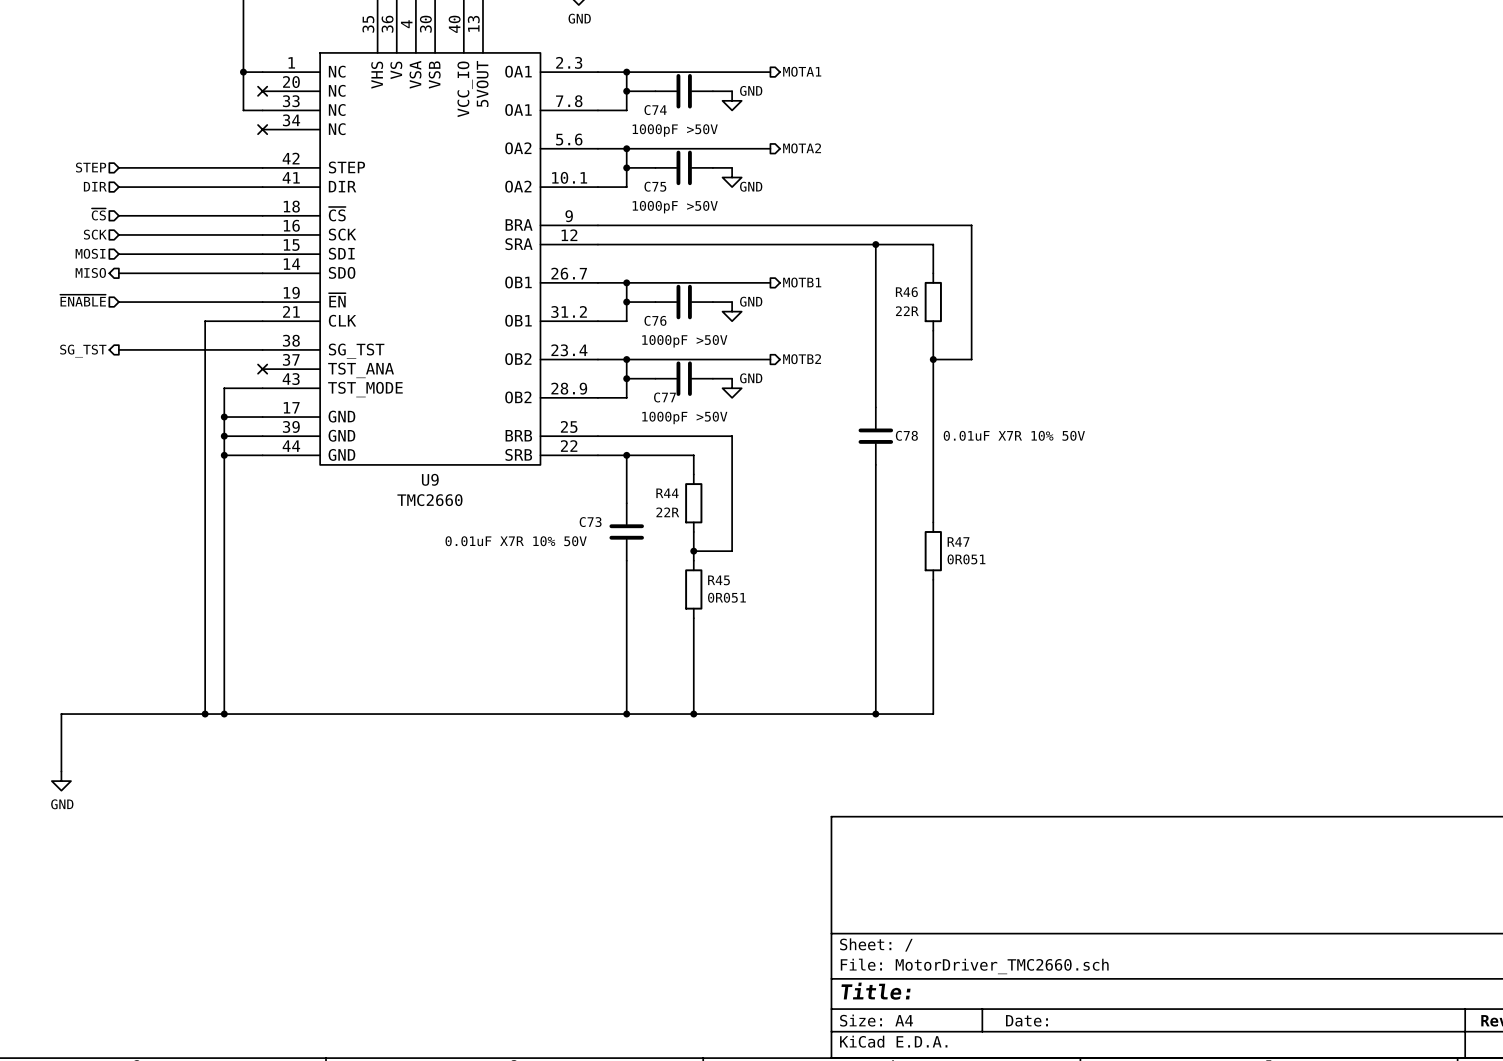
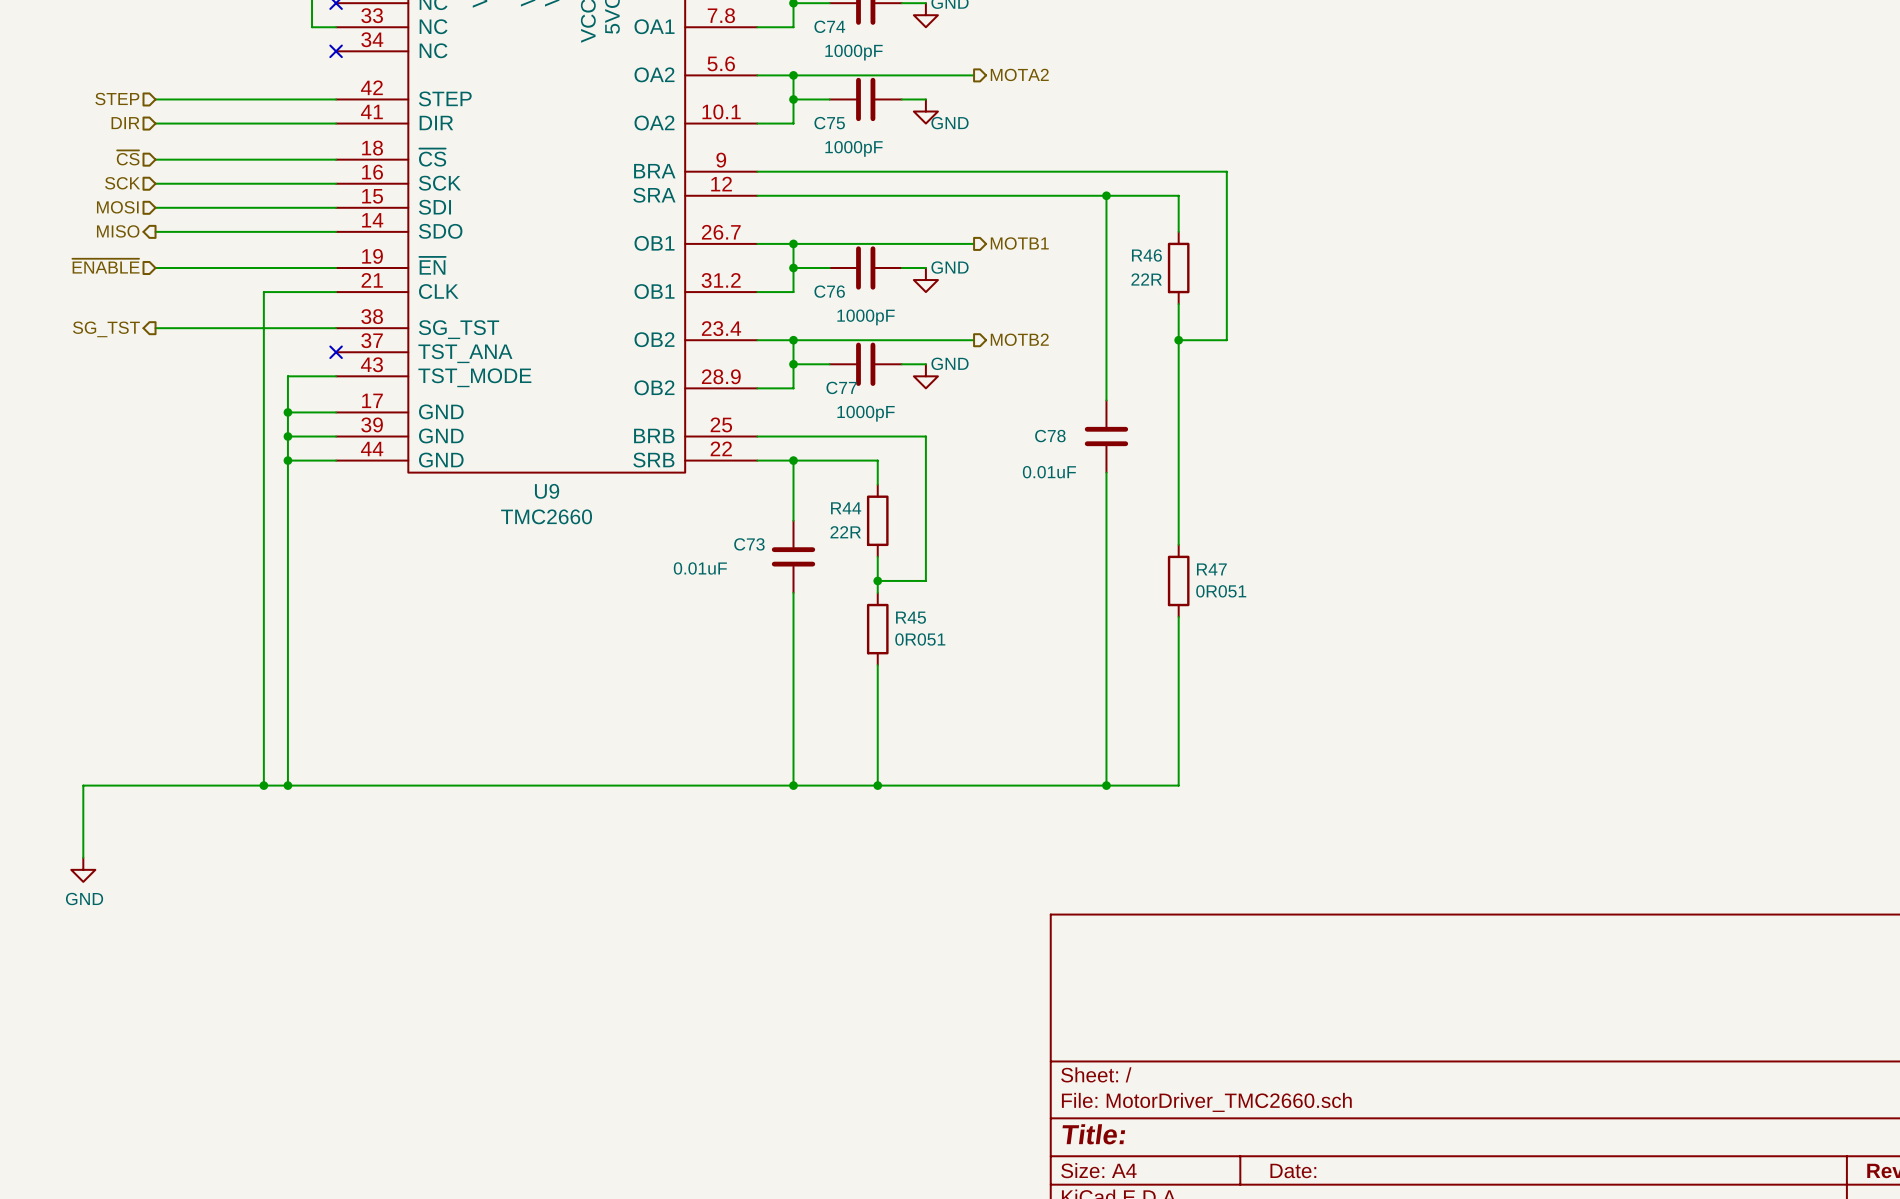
C74 value: 1000pF >50V (675, 130) -> 1000pF (854, 52)
C75 value: 1000pF >50V (675, 207) -> 1000pF (854, 148)
C76 value: 1000pF >50V (684, 341) -> 1000pF (866, 317)
C77 value: 1000pF >50V (684, 417) -> 1000pF (866, 413)
C78 name position: C78 (906, 435) -> C78 (1050, 436)
C78 value: 0.01uF X7R 10% 50V (1014, 435) -> 0.01uF (1049, 472)
C73 value: 0.01uF X7R 10% 50V (516, 541) -> 0.01uF (700, 568)

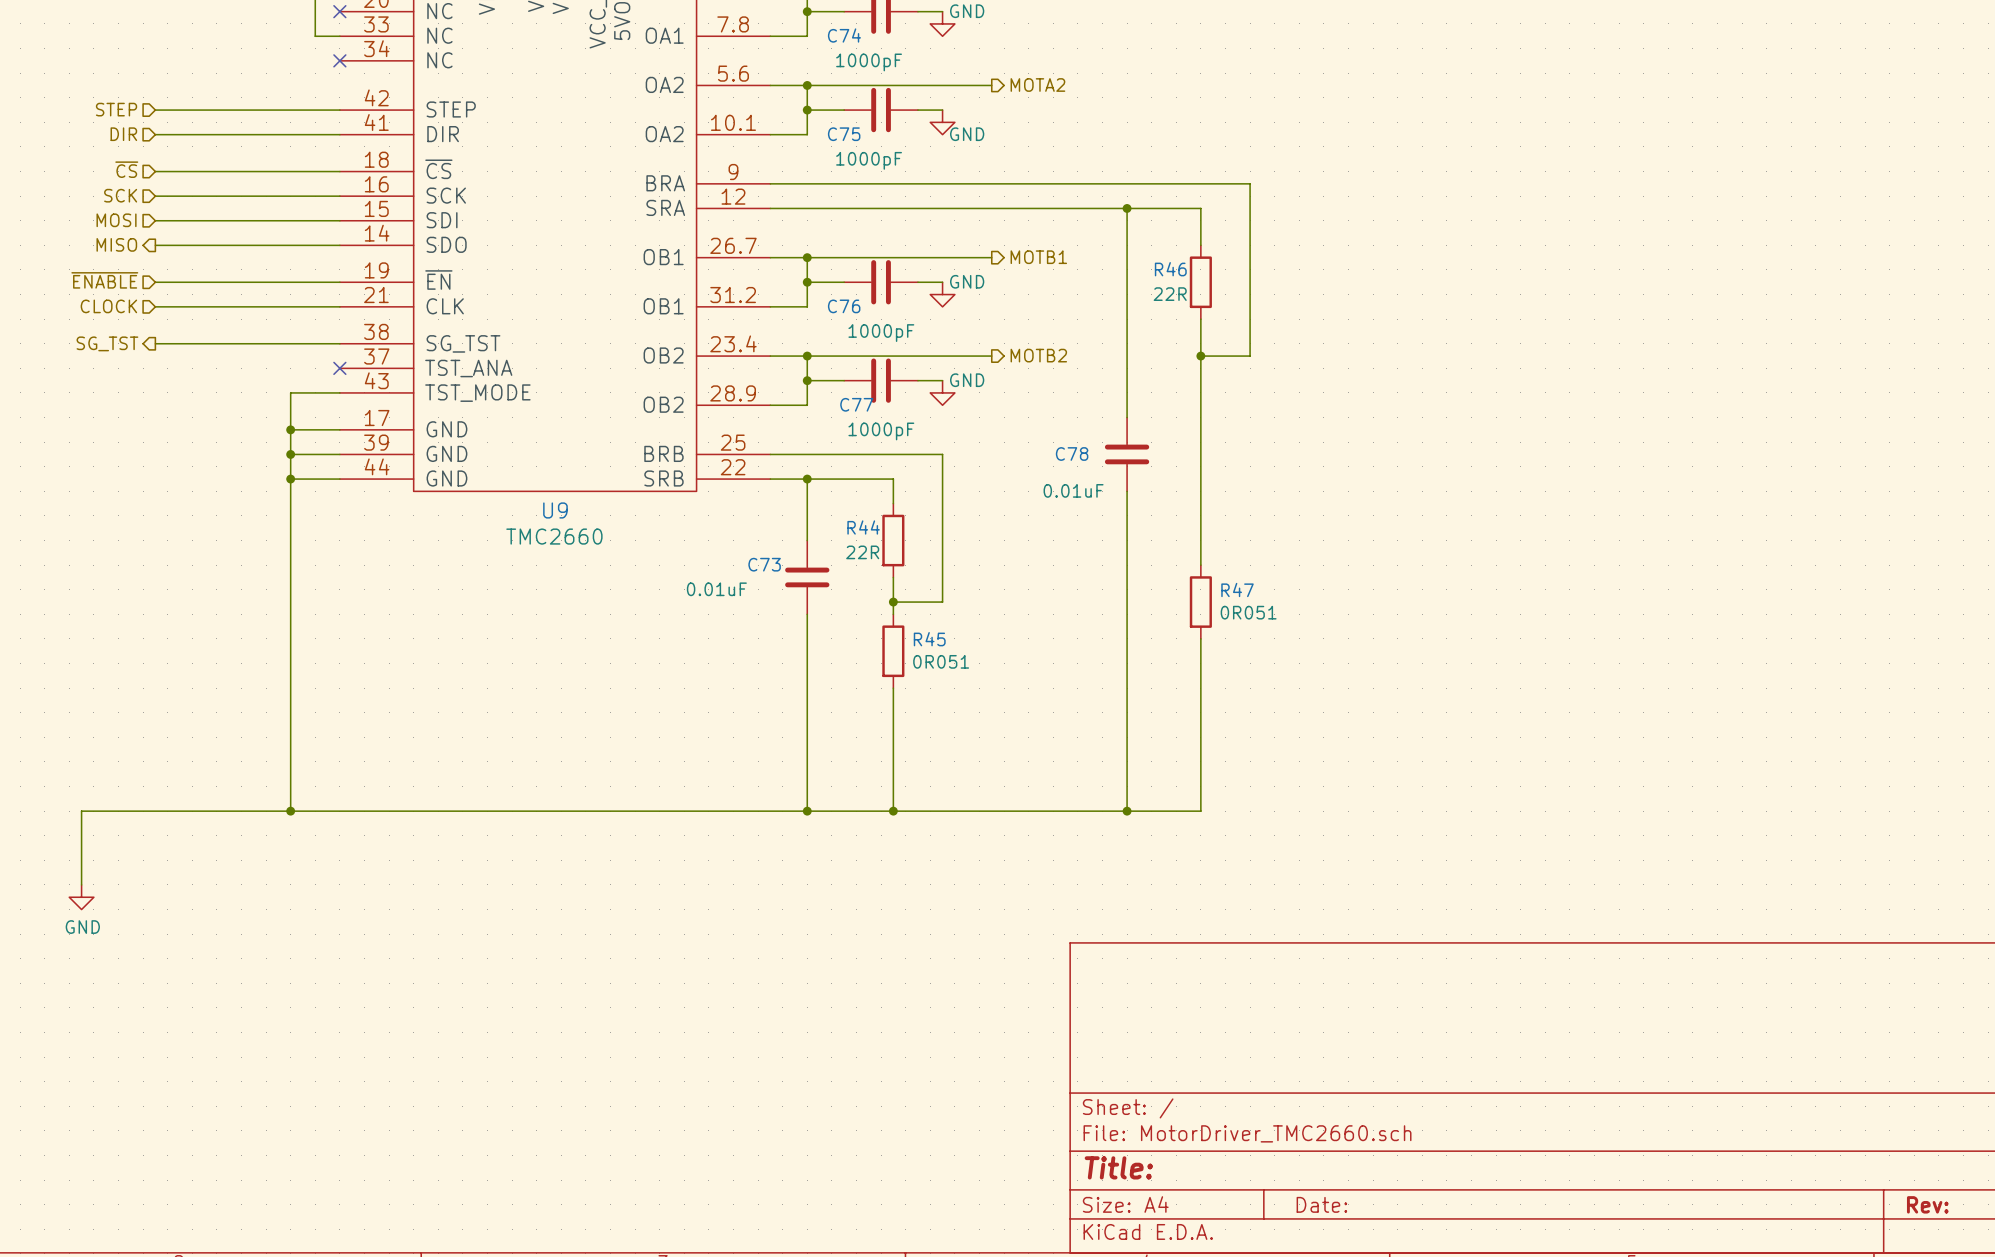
hierarchical label: none -> CLOCK (108, 306)
wire: (263, 292) (263, 785) -> (266, 306) (155, 306)
junction: (263, 785) -> none

